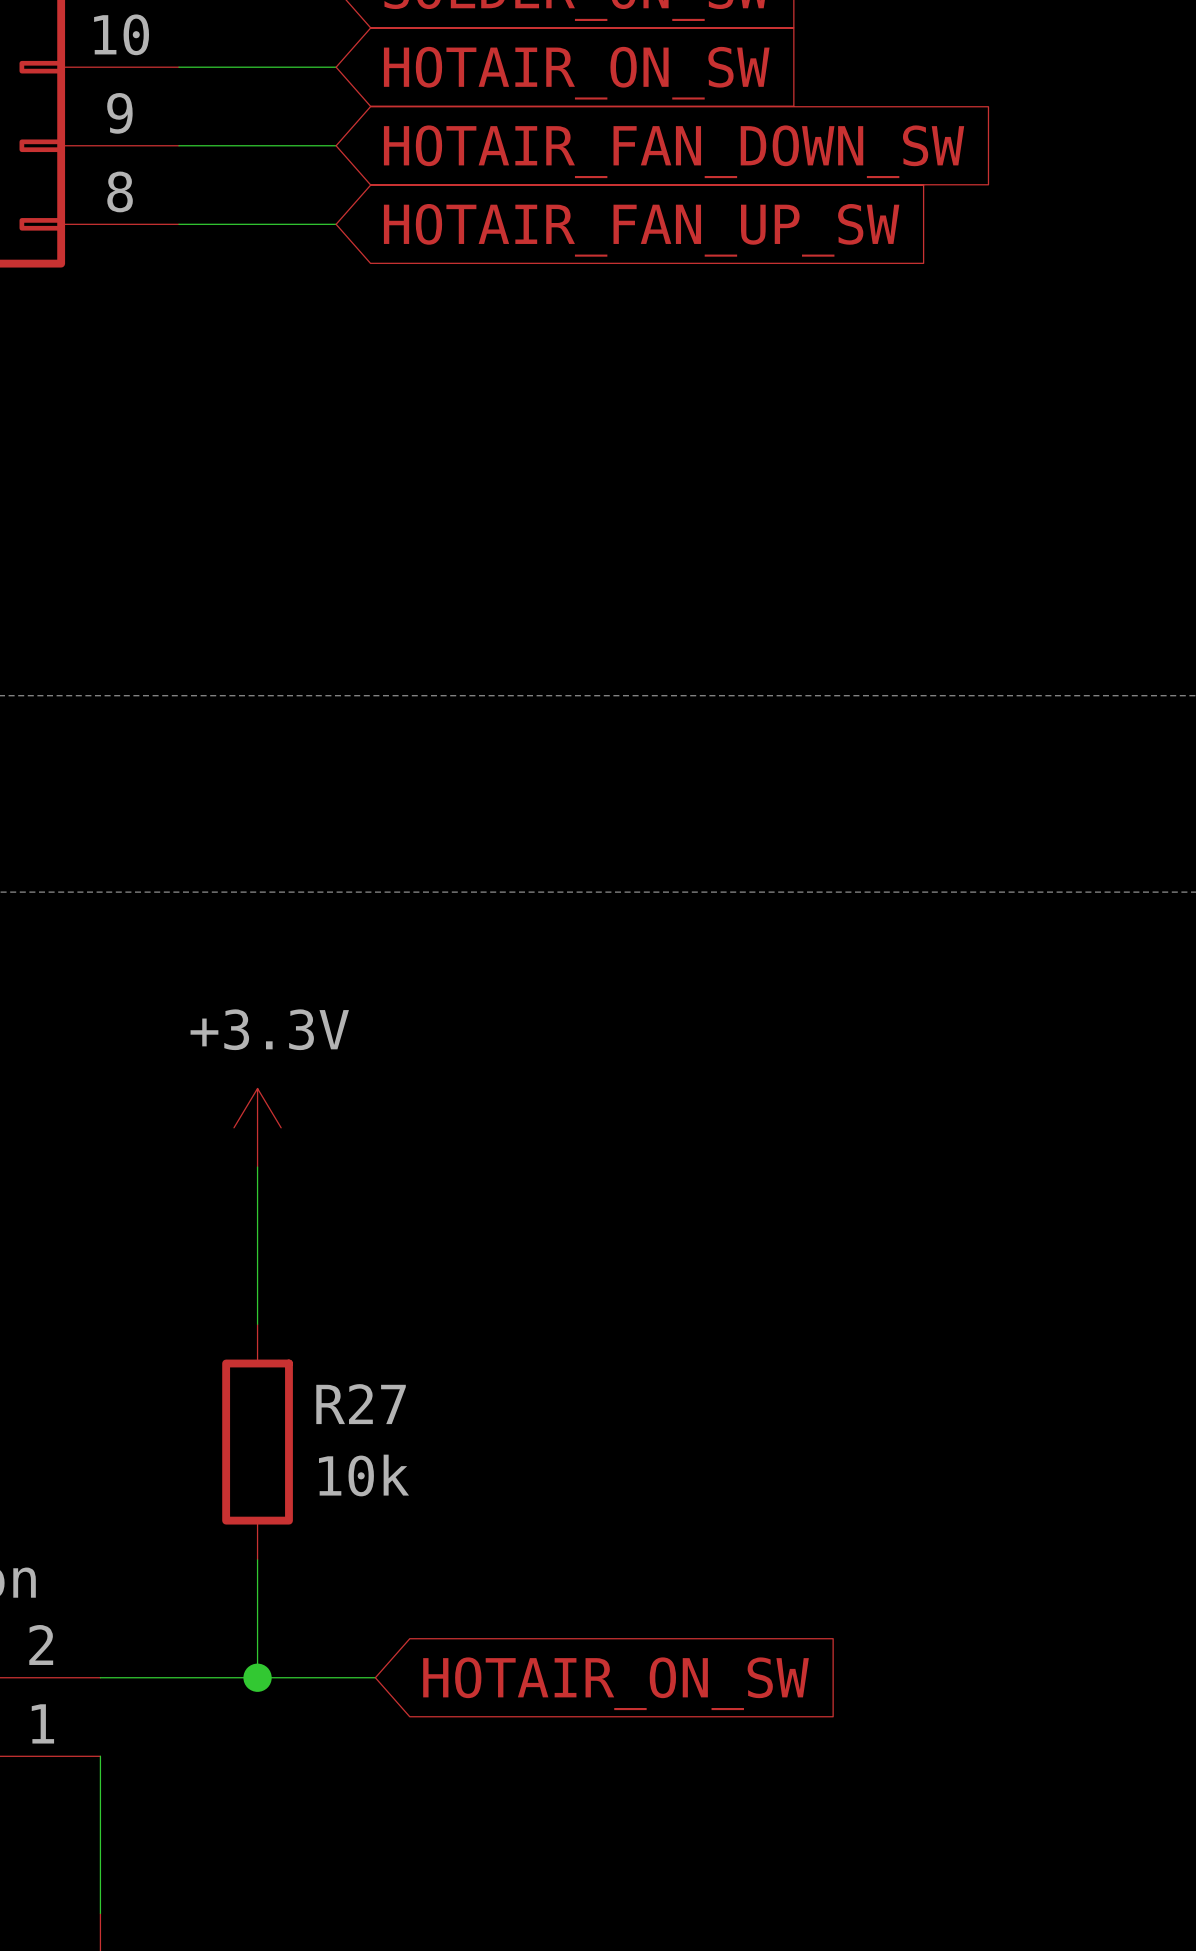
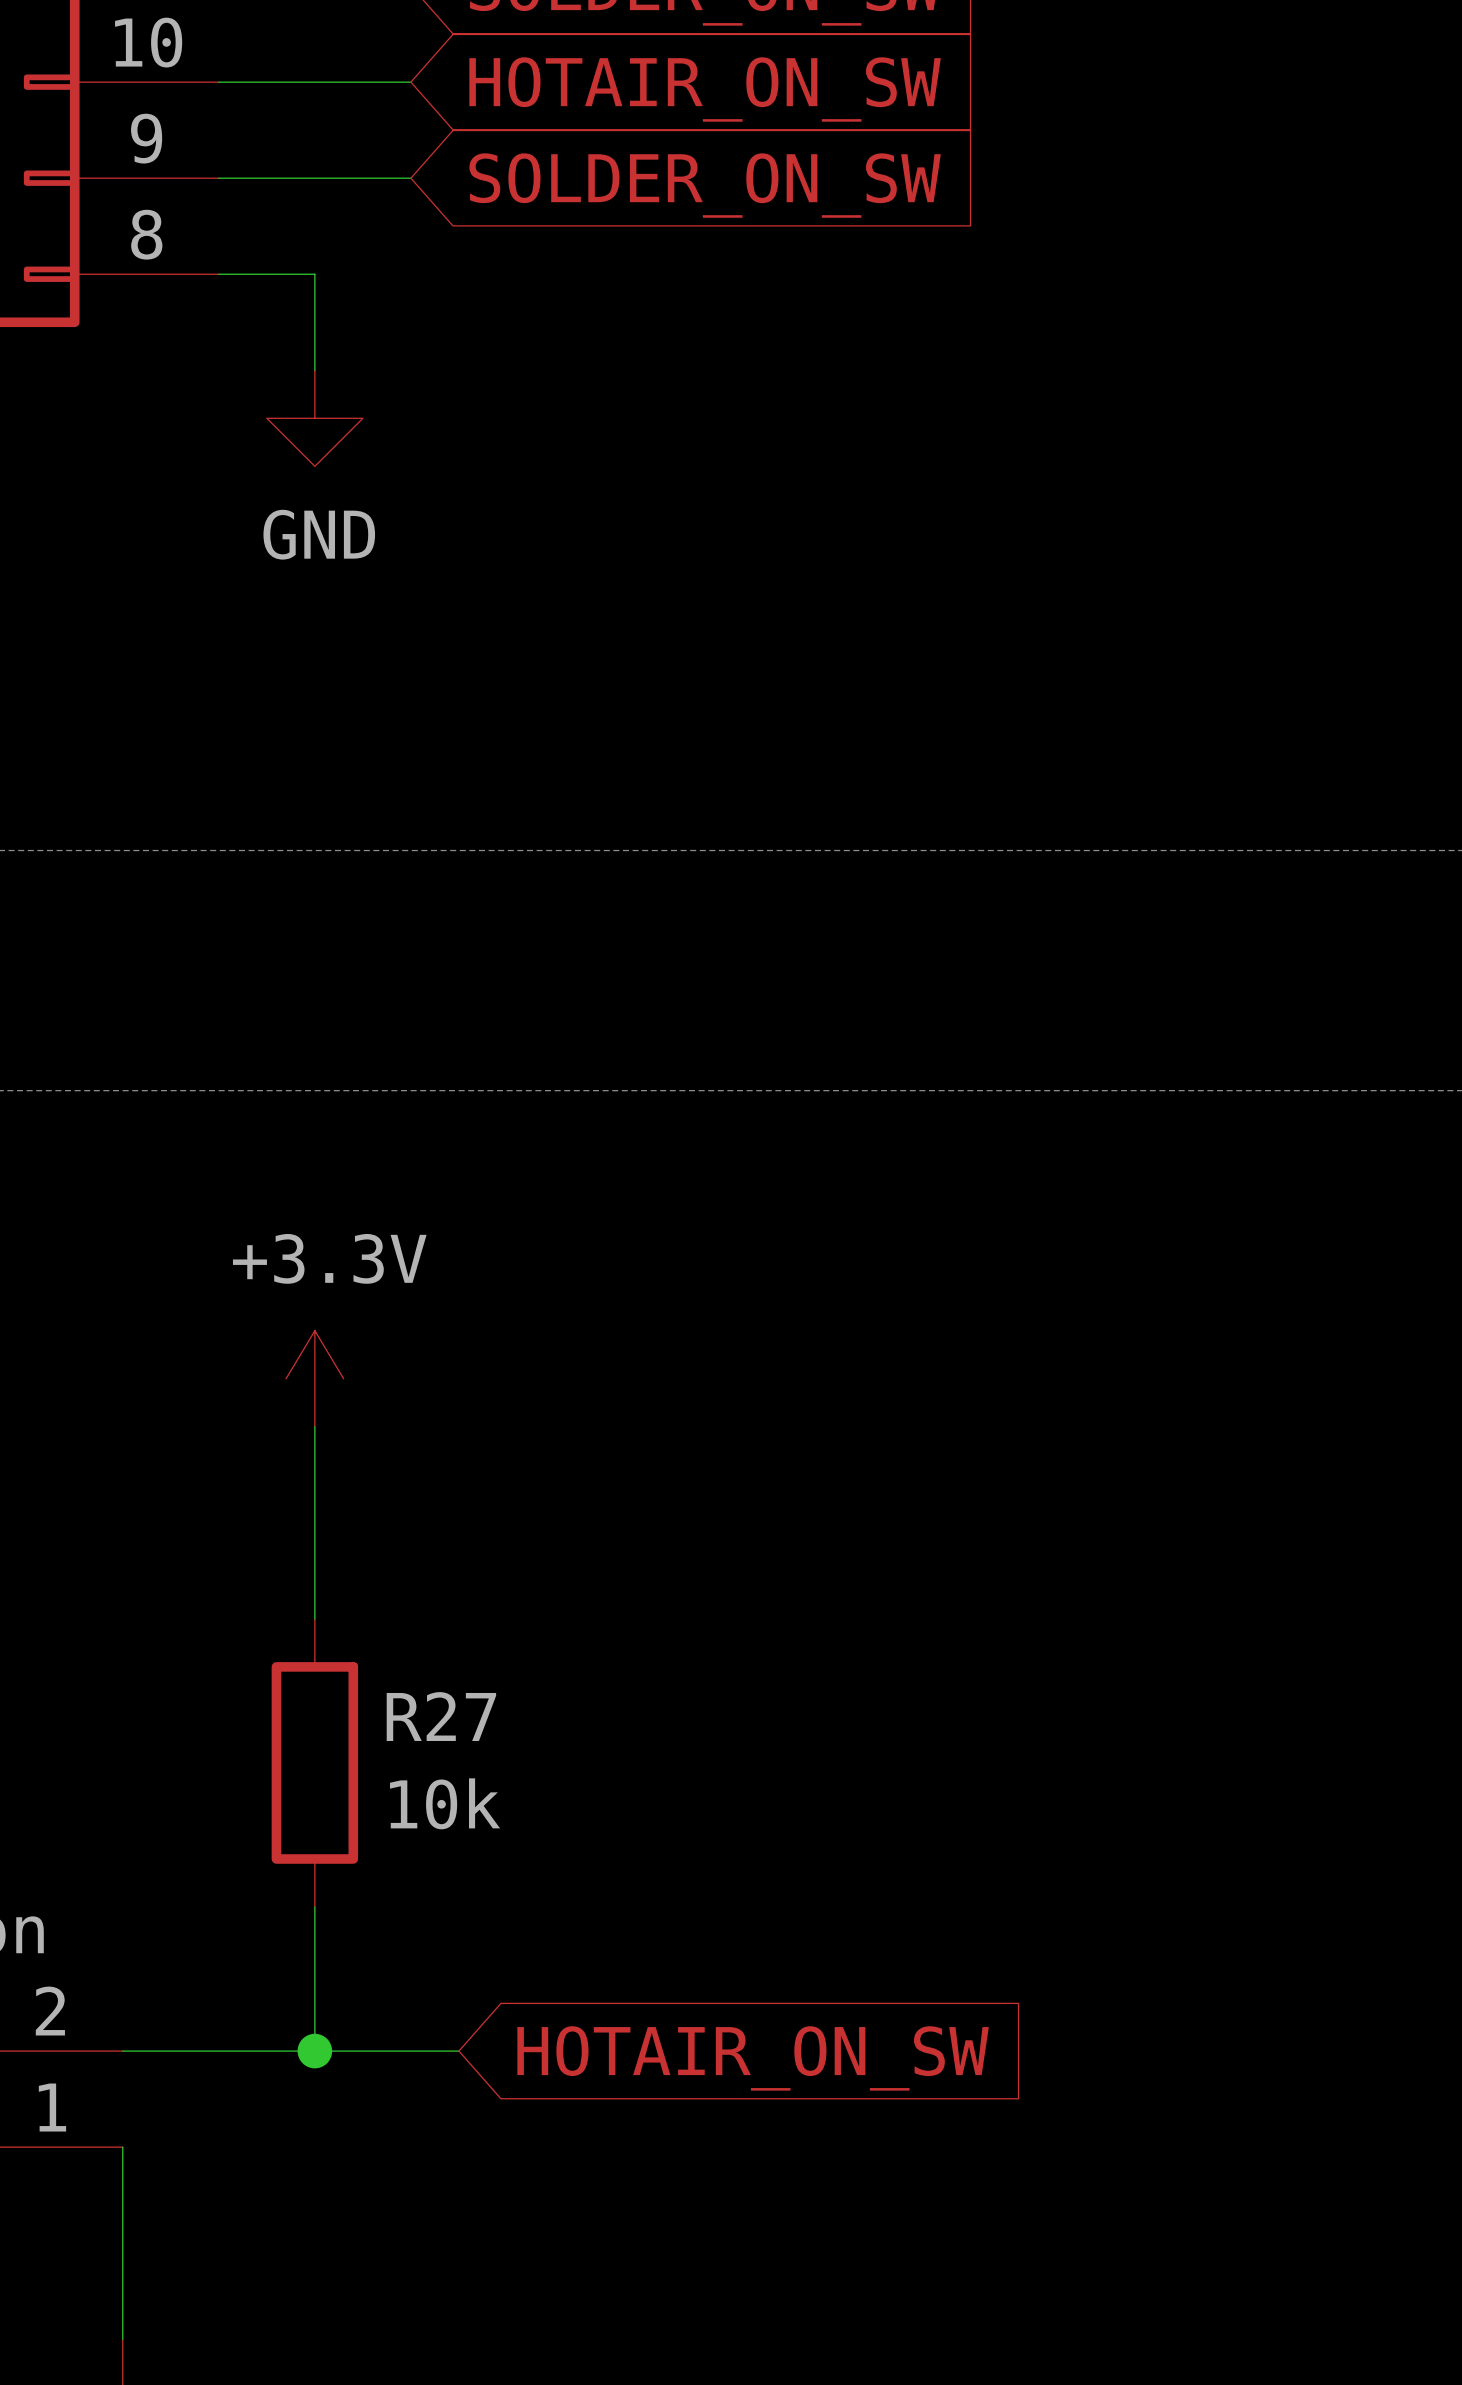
global label: HOTAIR_FAN_DOWN_SW (674, 151) -> SOLDER_ON_SW (705, 185)
wire: (257, 224) (336, 224) -> (314, 274) (314, 370)
global label: HOTAIR_FAN_UP_SW (641, 230) -> none
power symbol: none -> GND (314, 418)

